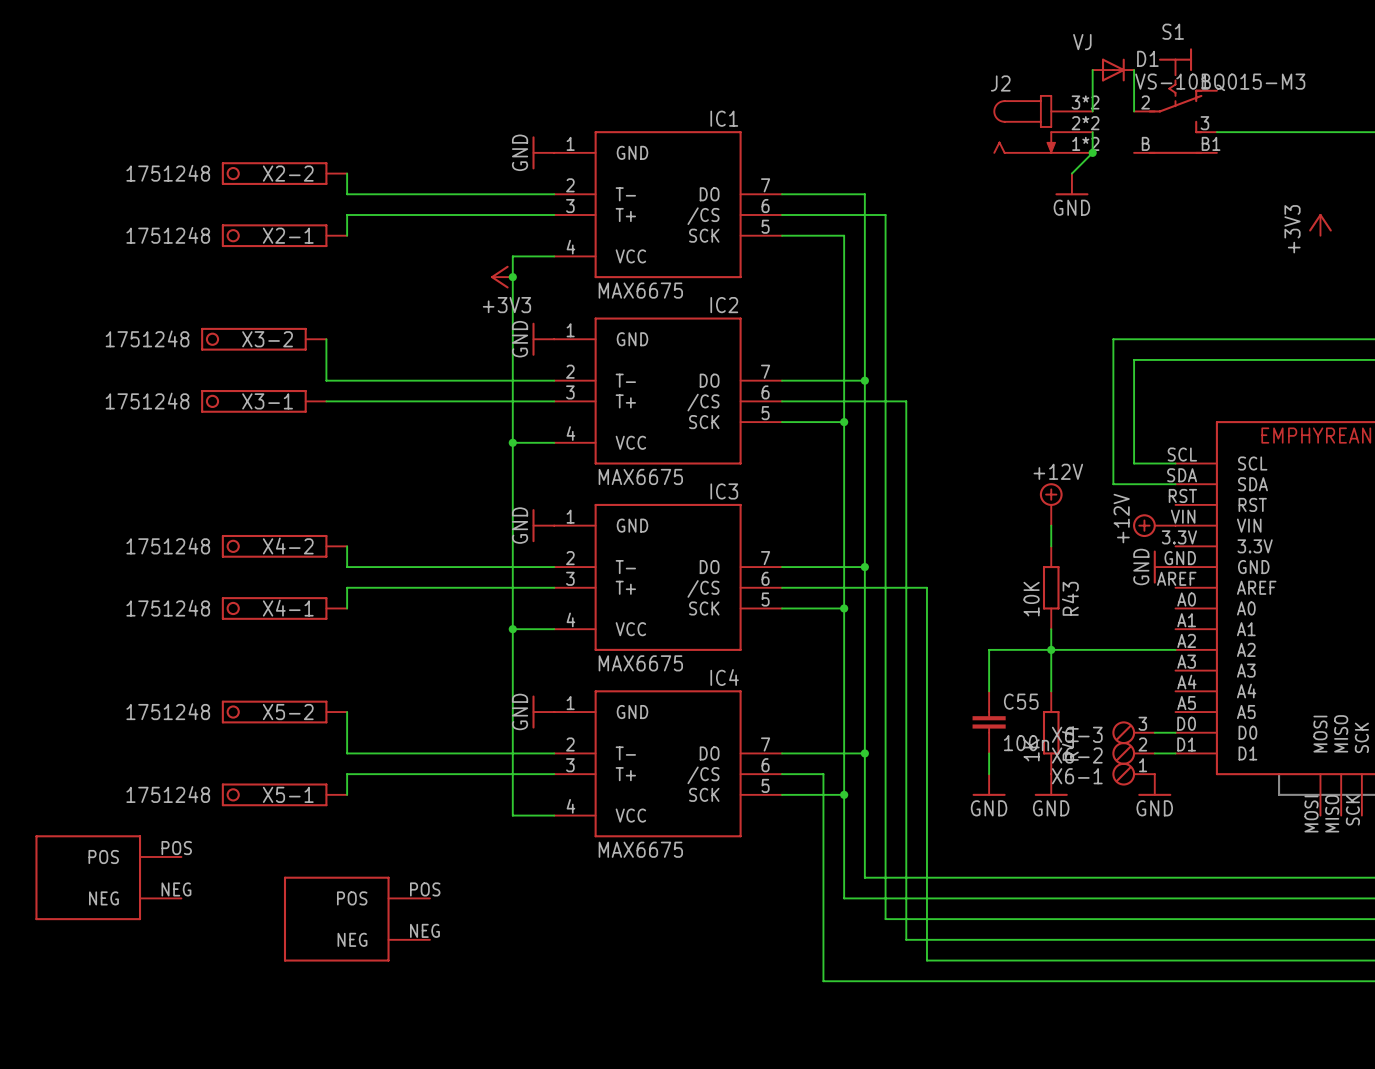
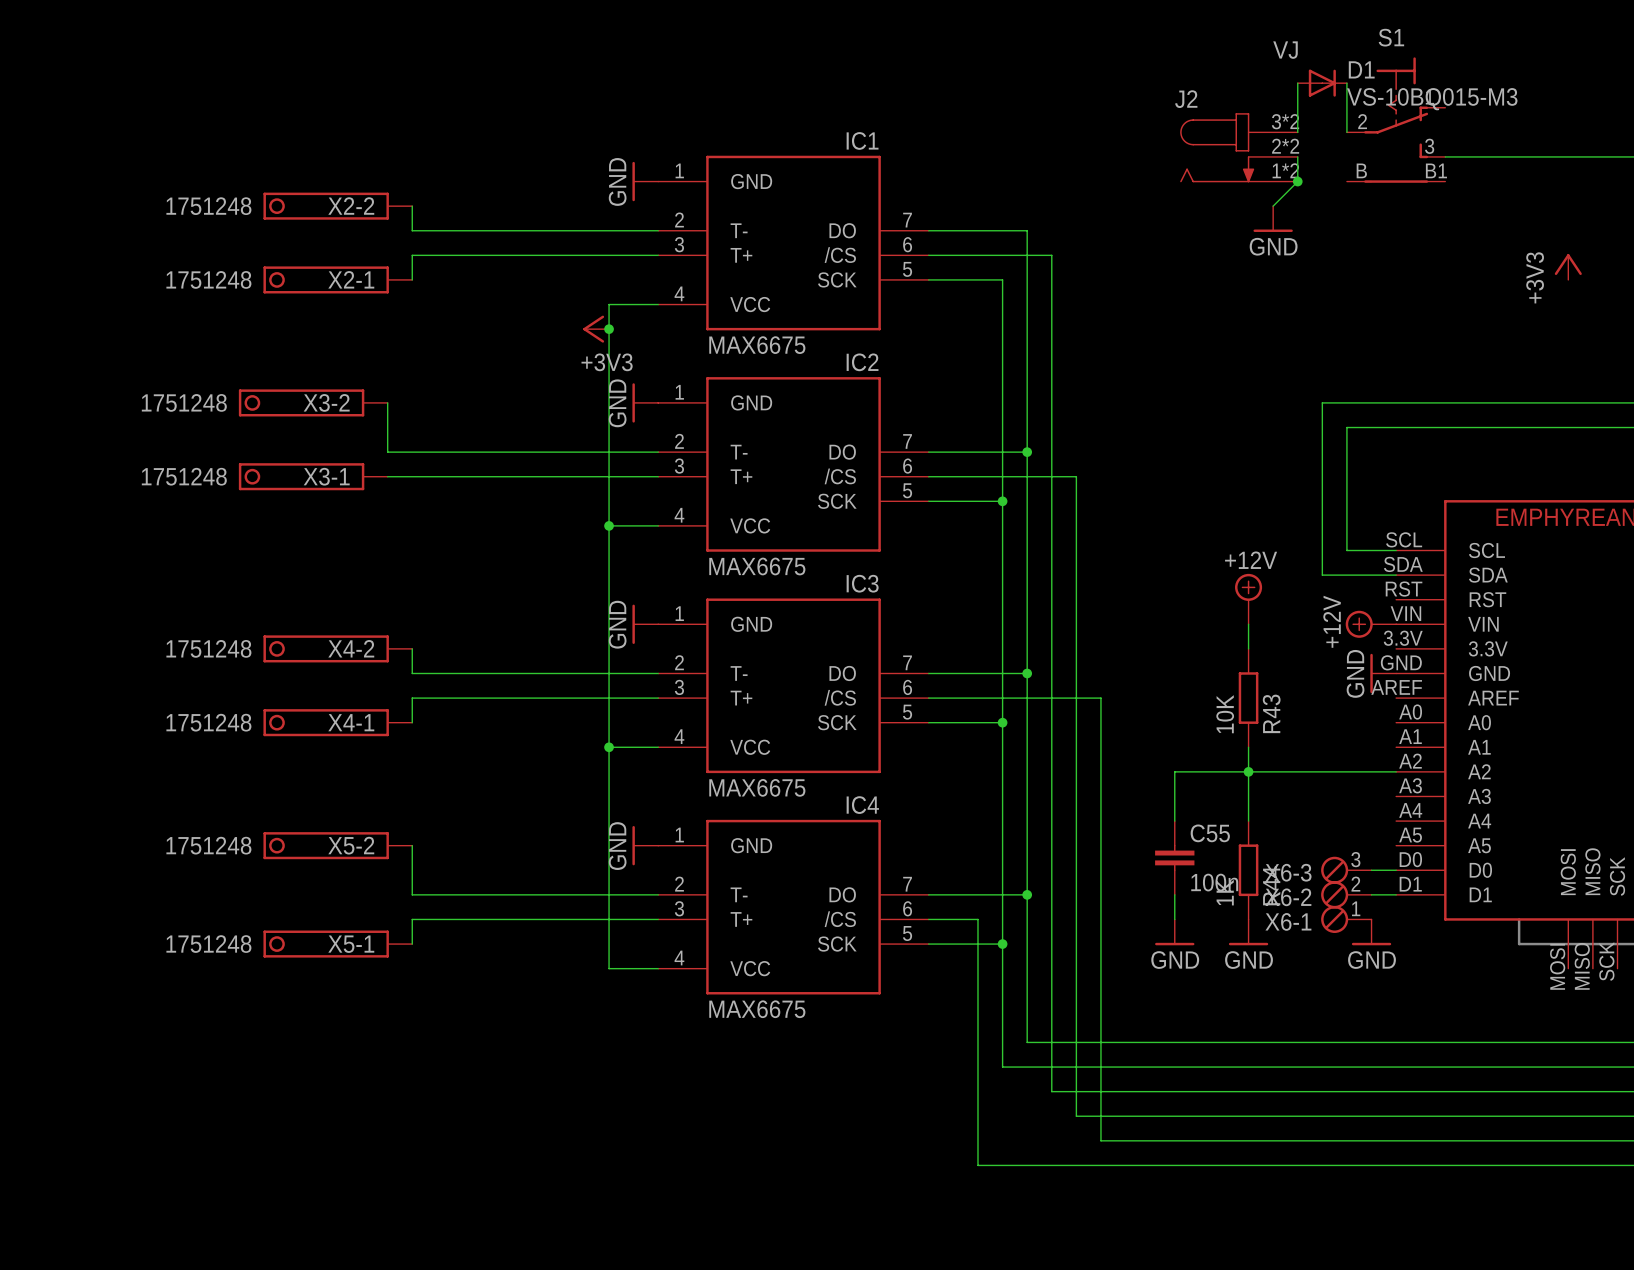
part: (108, 877) -> none
part: (356, 919) -> none

